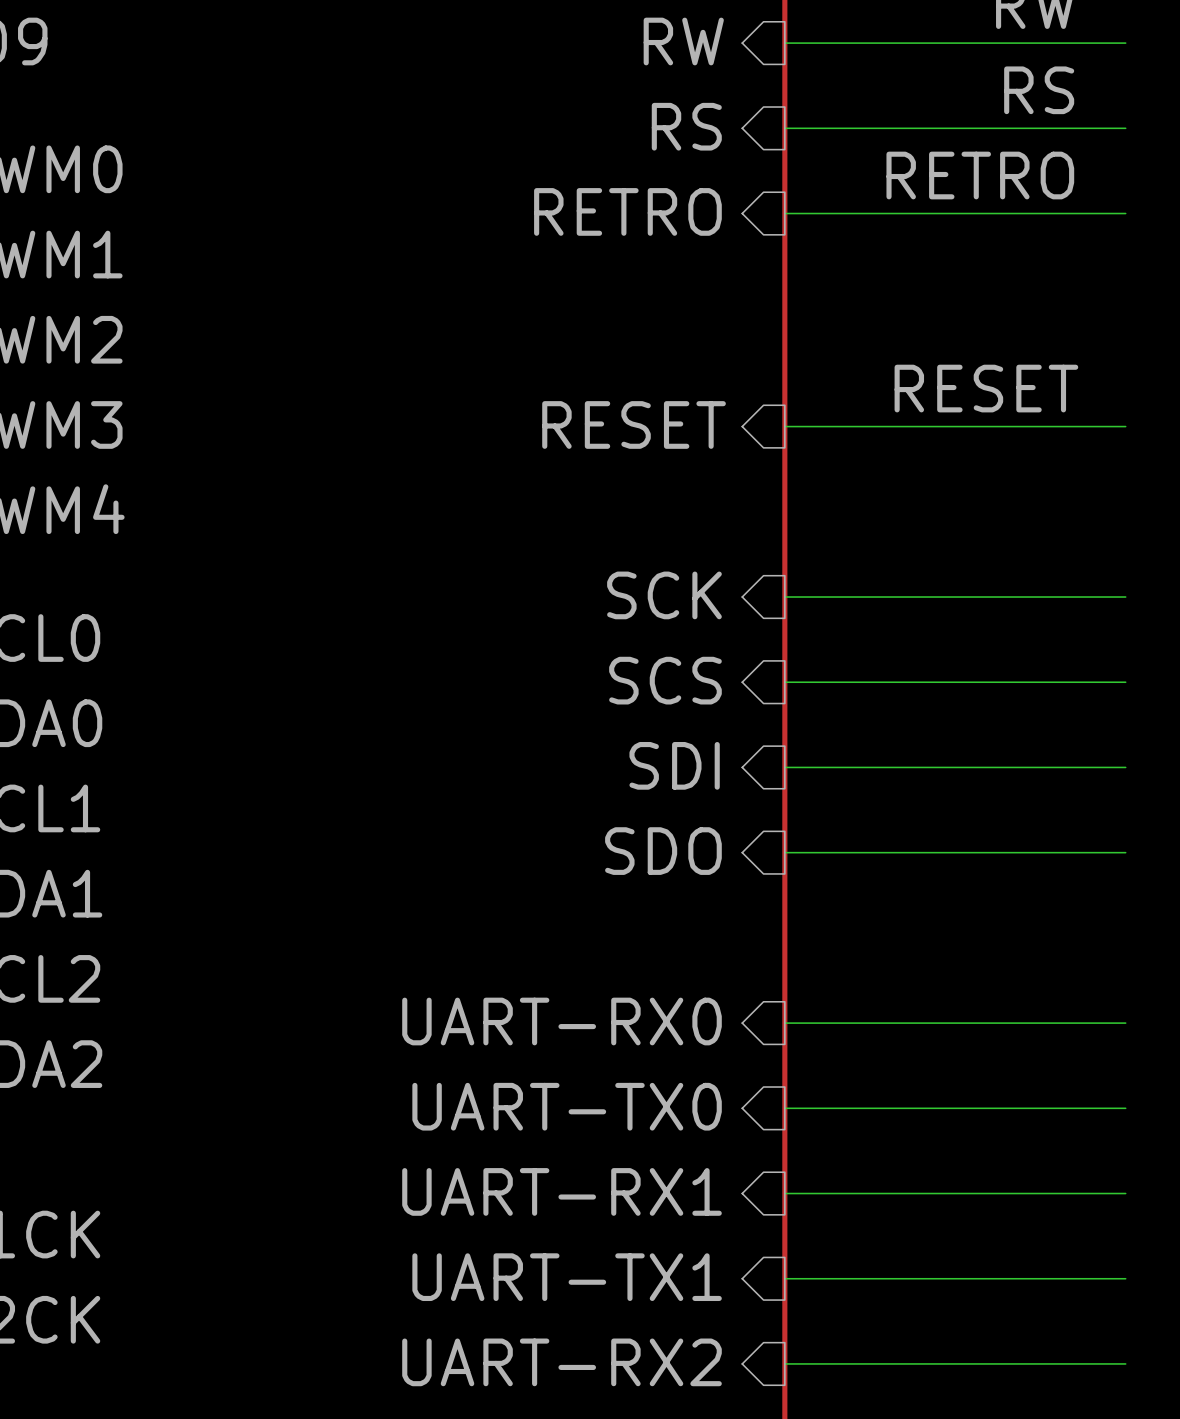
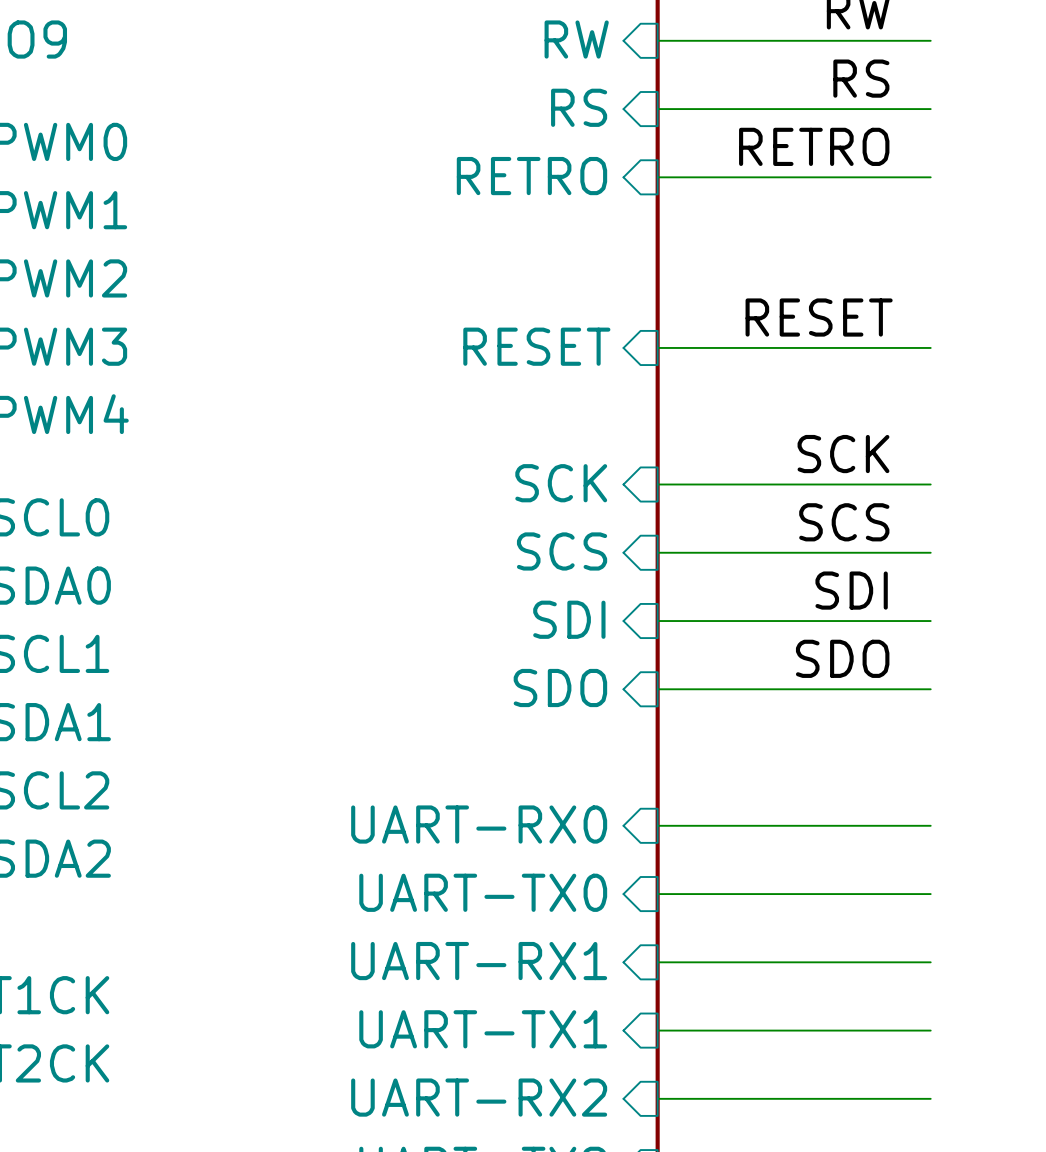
label: none -> SCK (843, 454)
label: none -> SCS (844, 522)
label: none -> SDI (851, 590)
label: none -> SDO (842, 658)

